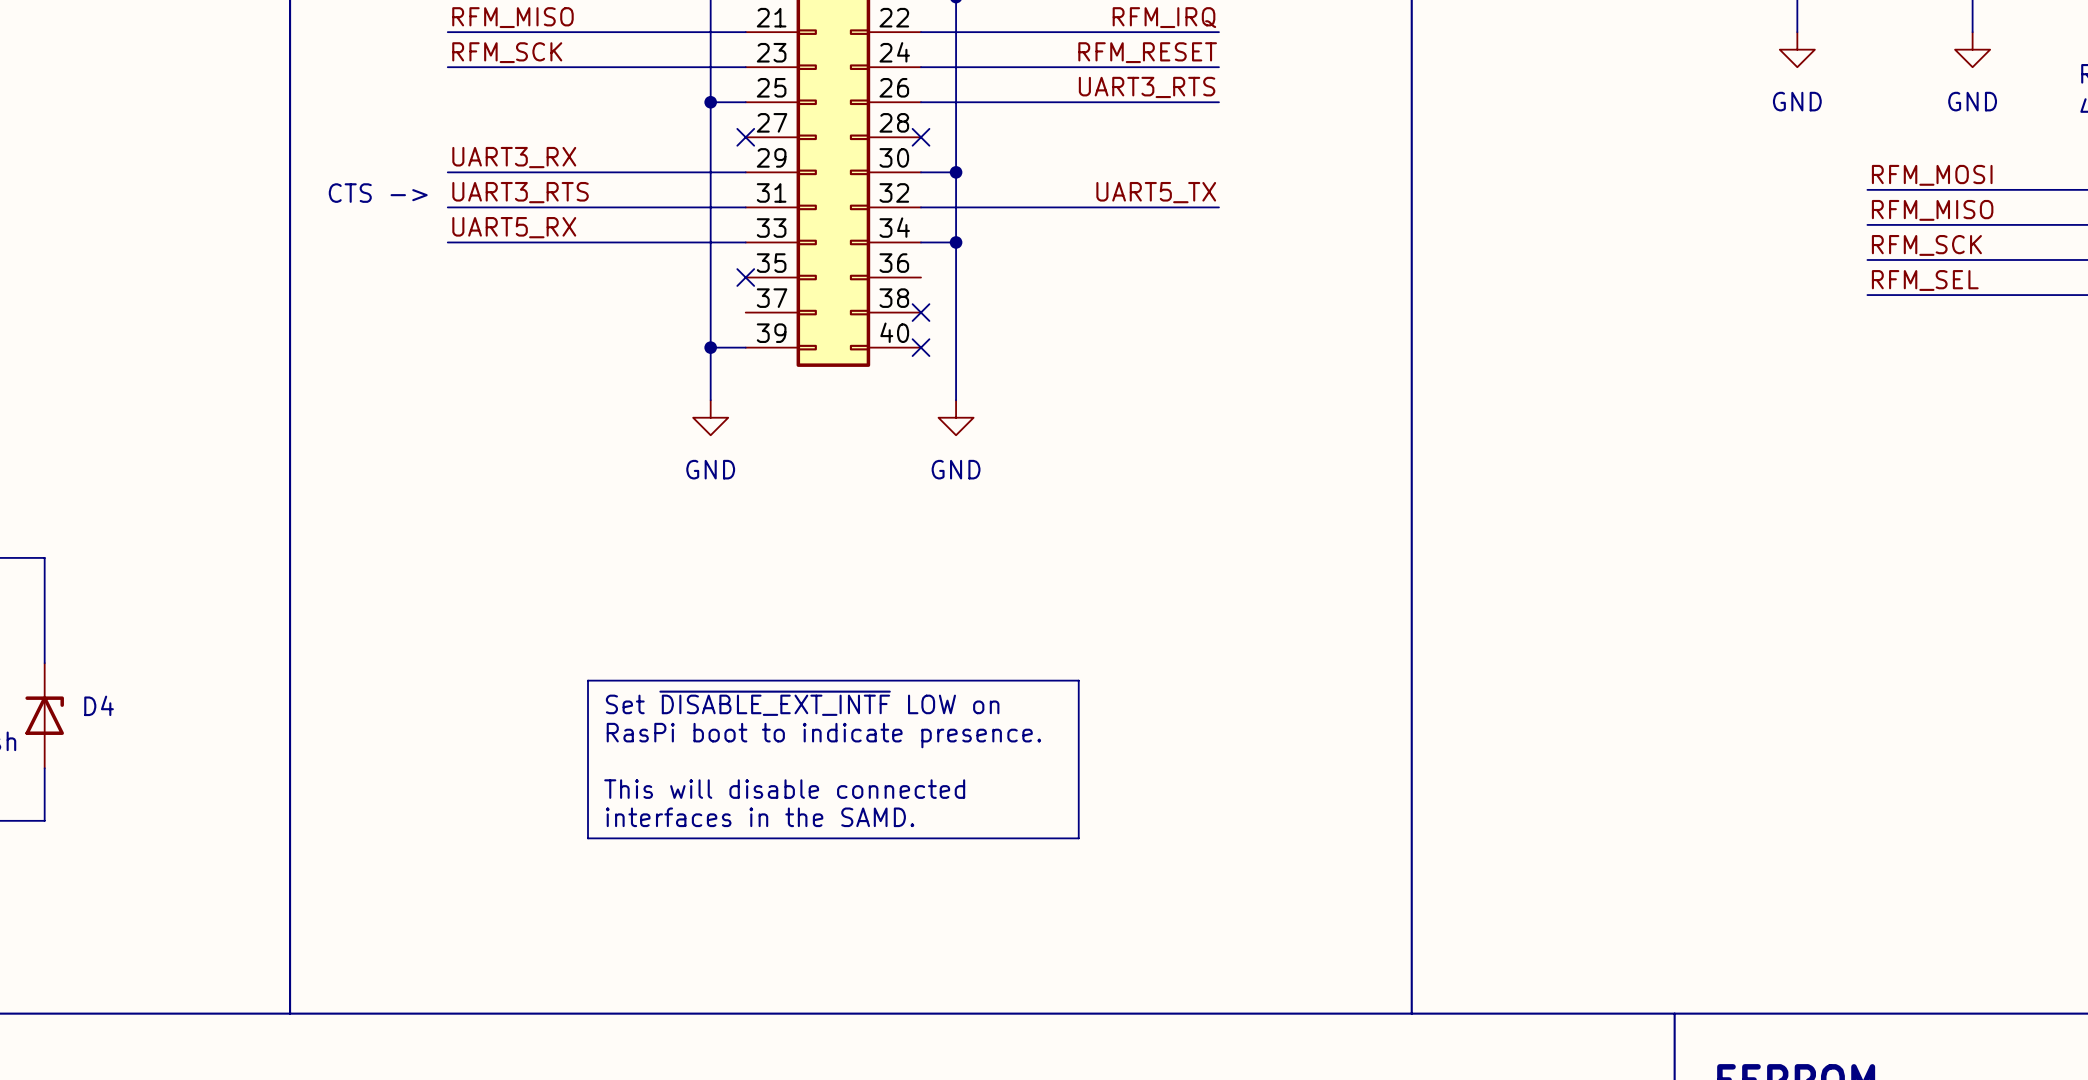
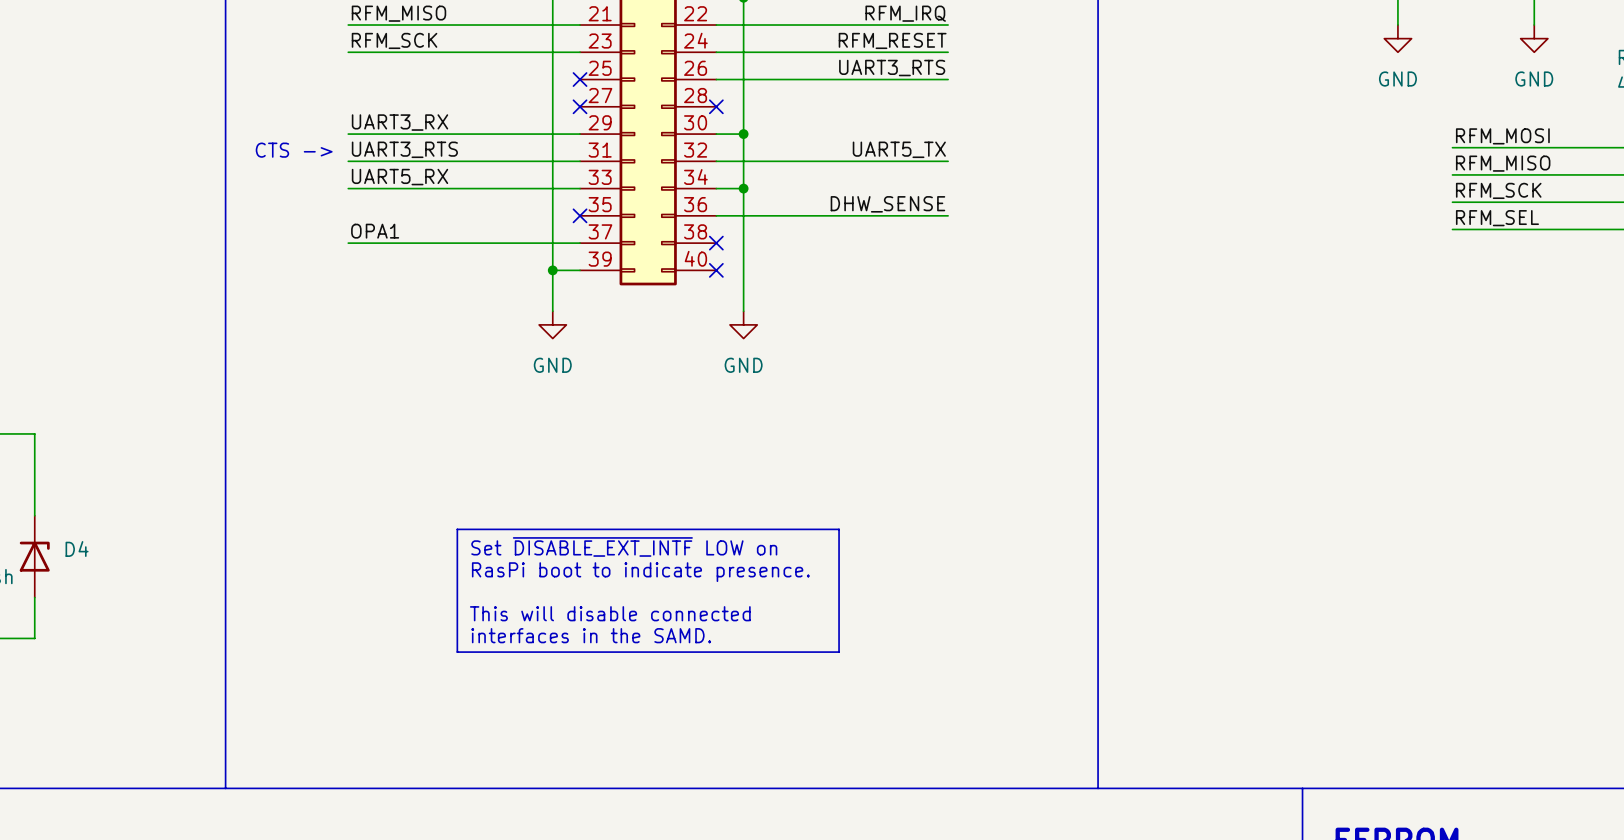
wire: (710, 102) (745, 102) -> none
junction: (710, 102) -> none
no-connect mark: none -> (580, 79)
label: none -> DHW_SENSE (887, 204)
wire: none -> (716, 215) (948, 215)
label: none -> OPA1 (375, 231)
wire: none -> (348, 243) (580, 243)

